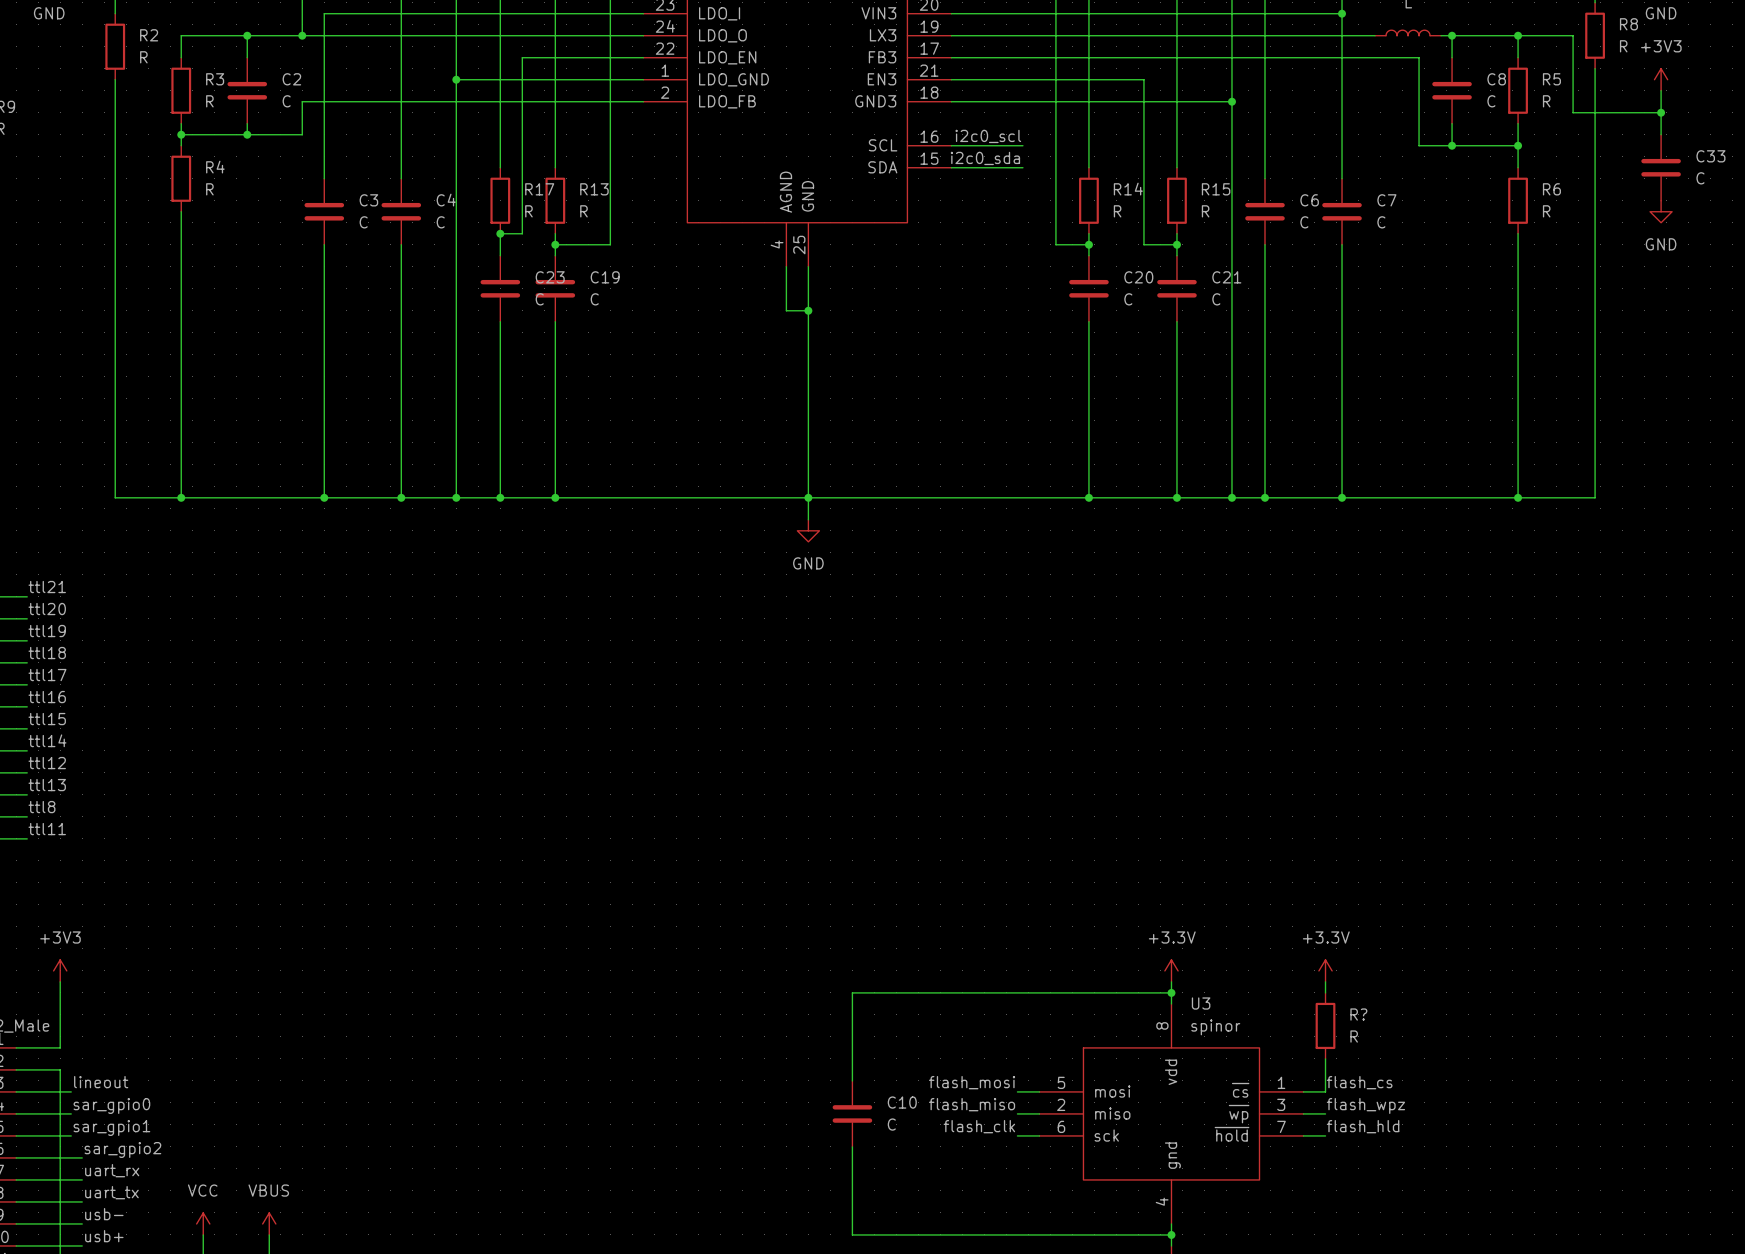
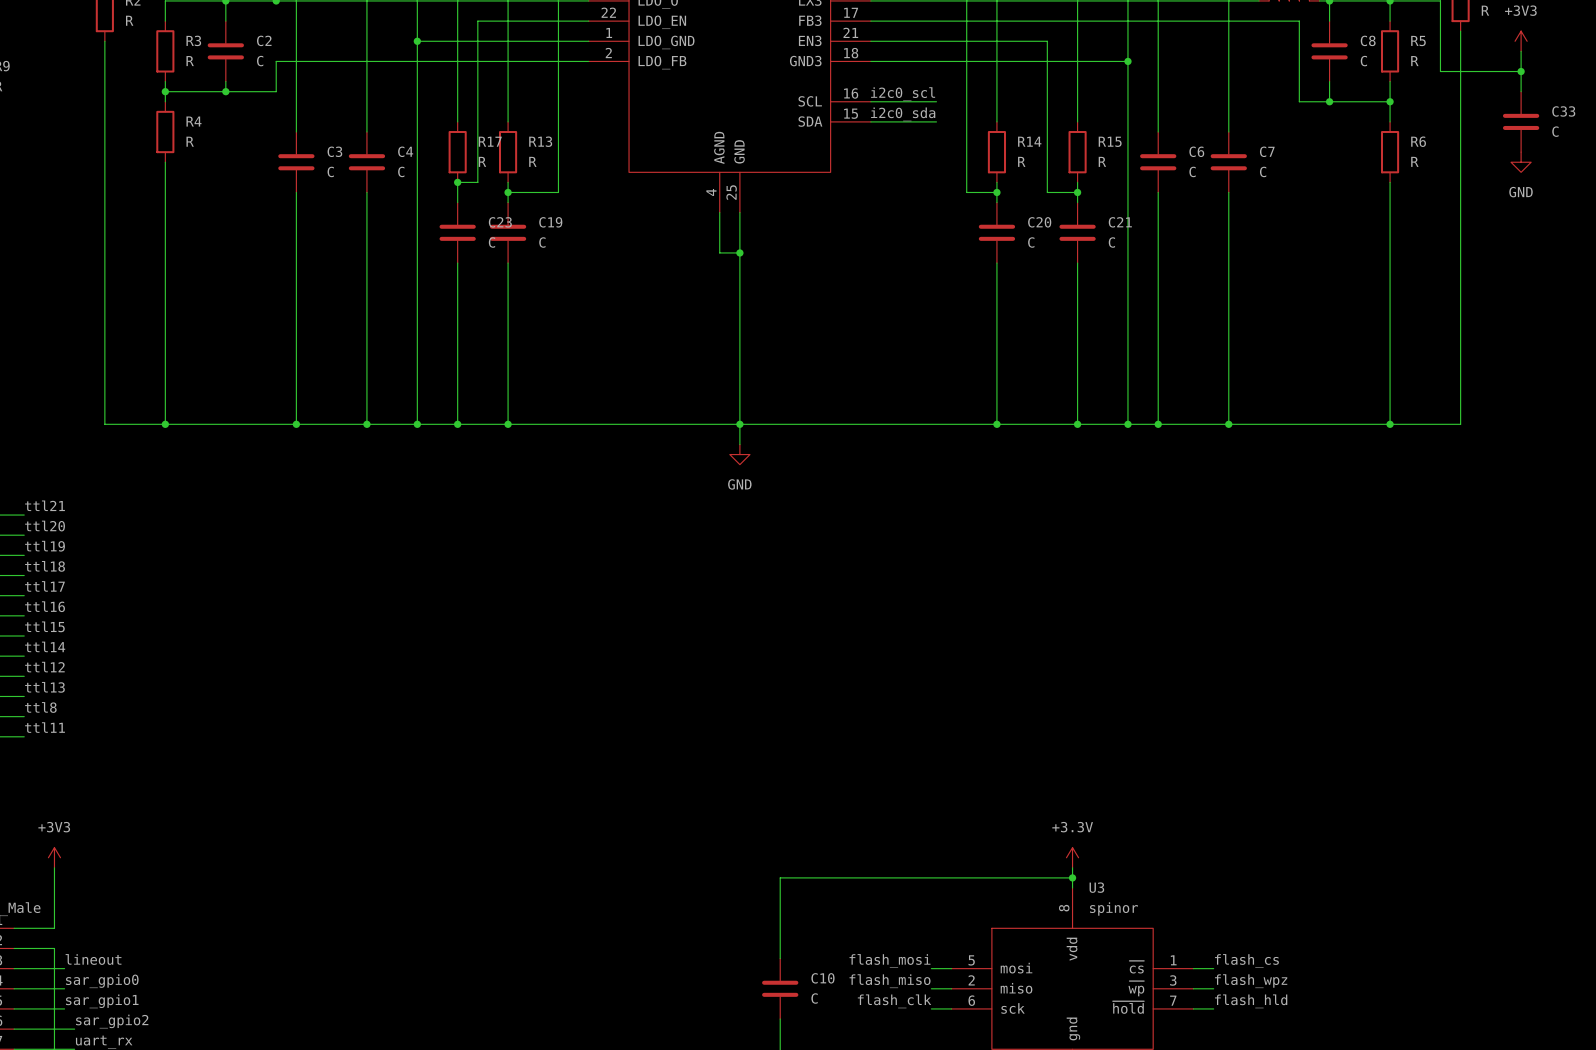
power symbol: +3.3V (1325, 970) -> none
wire: (1325, 981) (1325, 992) -> none
R?: R (1325, 1025) -> none
wire: (1325, 1058) (1325, 1091) -> none

